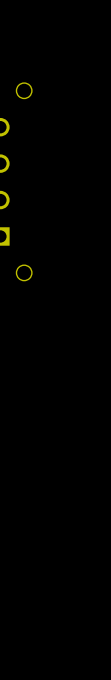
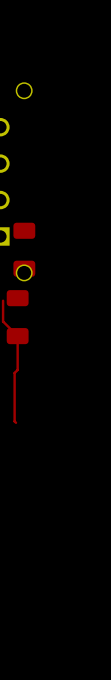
part: none -> (24, 249)
top track: none -> (3, 300) (3, 321) (17, 336) (17, 369) (14, 372) (15, 422)
part: none -> (17, 317)

